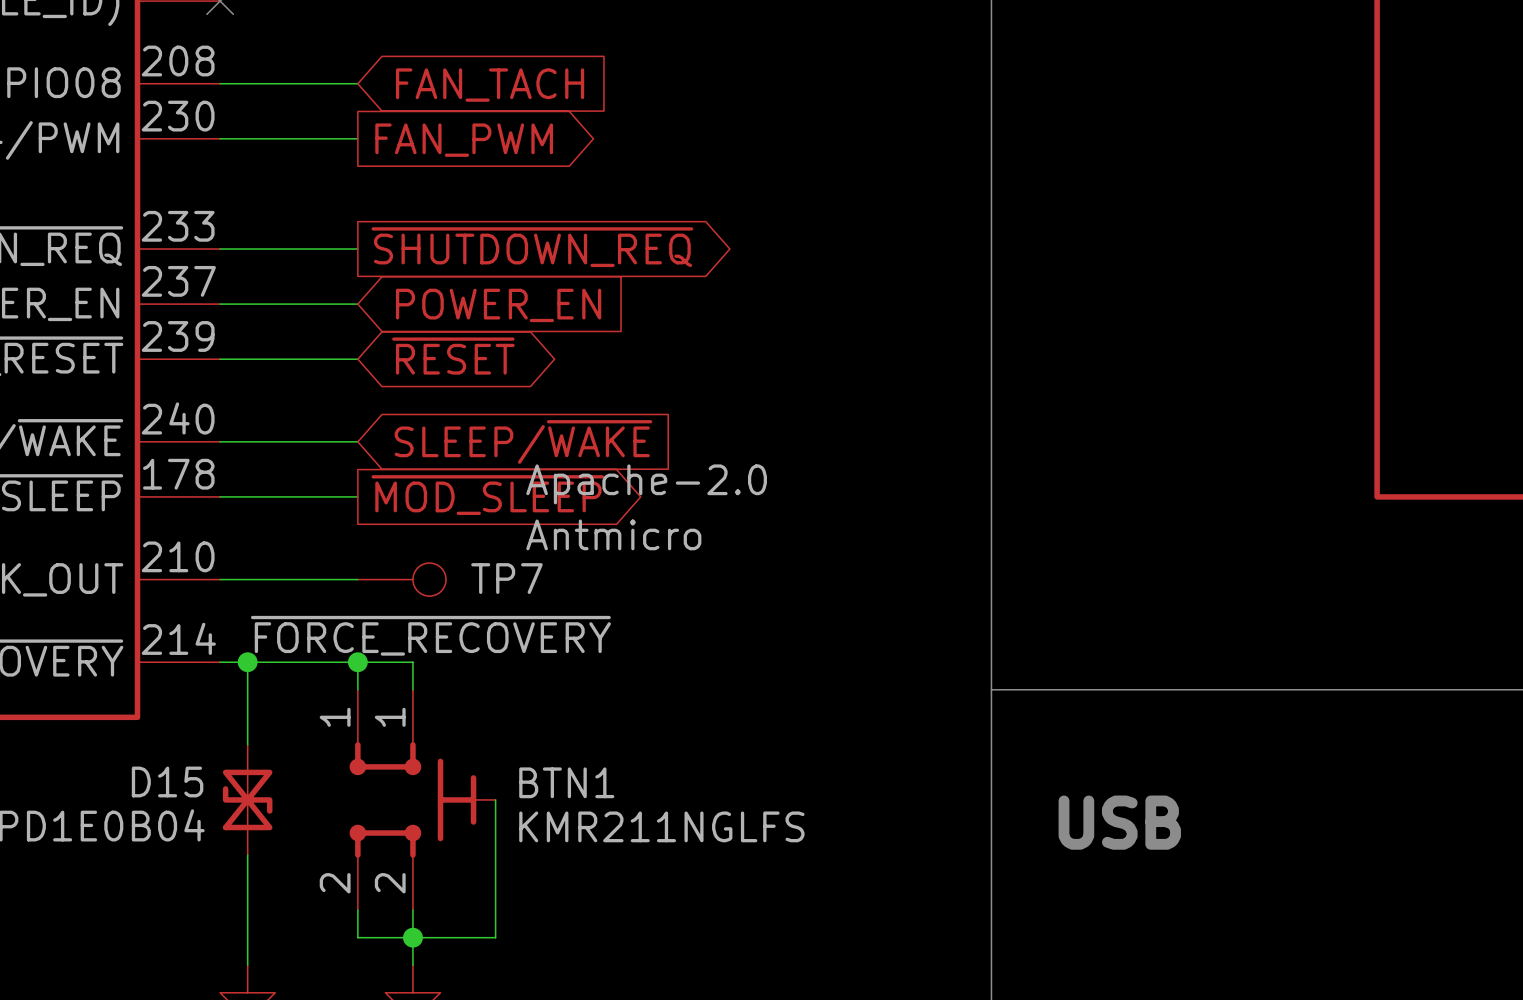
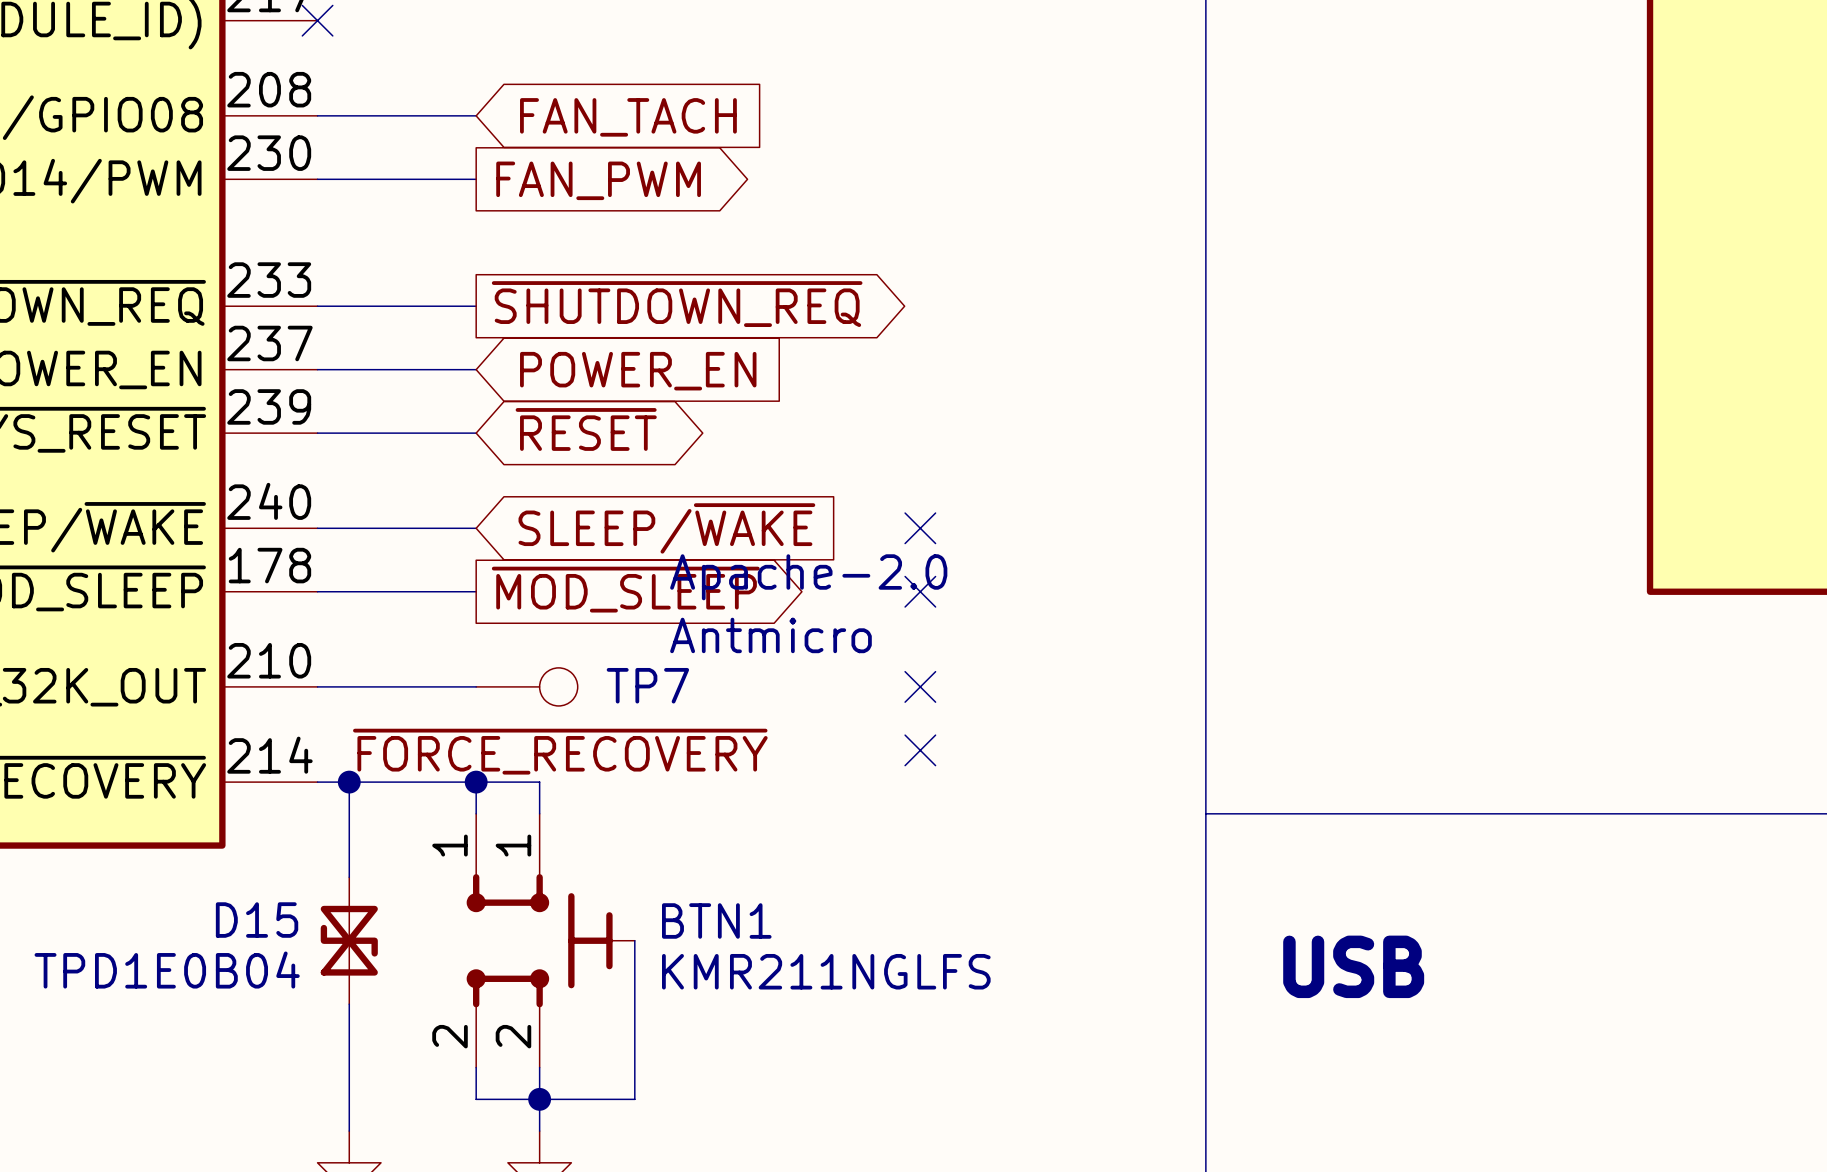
no-connect mark: none -> (920, 528)
no-connect mark: none -> (920, 591)
no-connect mark: none -> (920, 686)
no-connect mark: none -> (920, 750)

